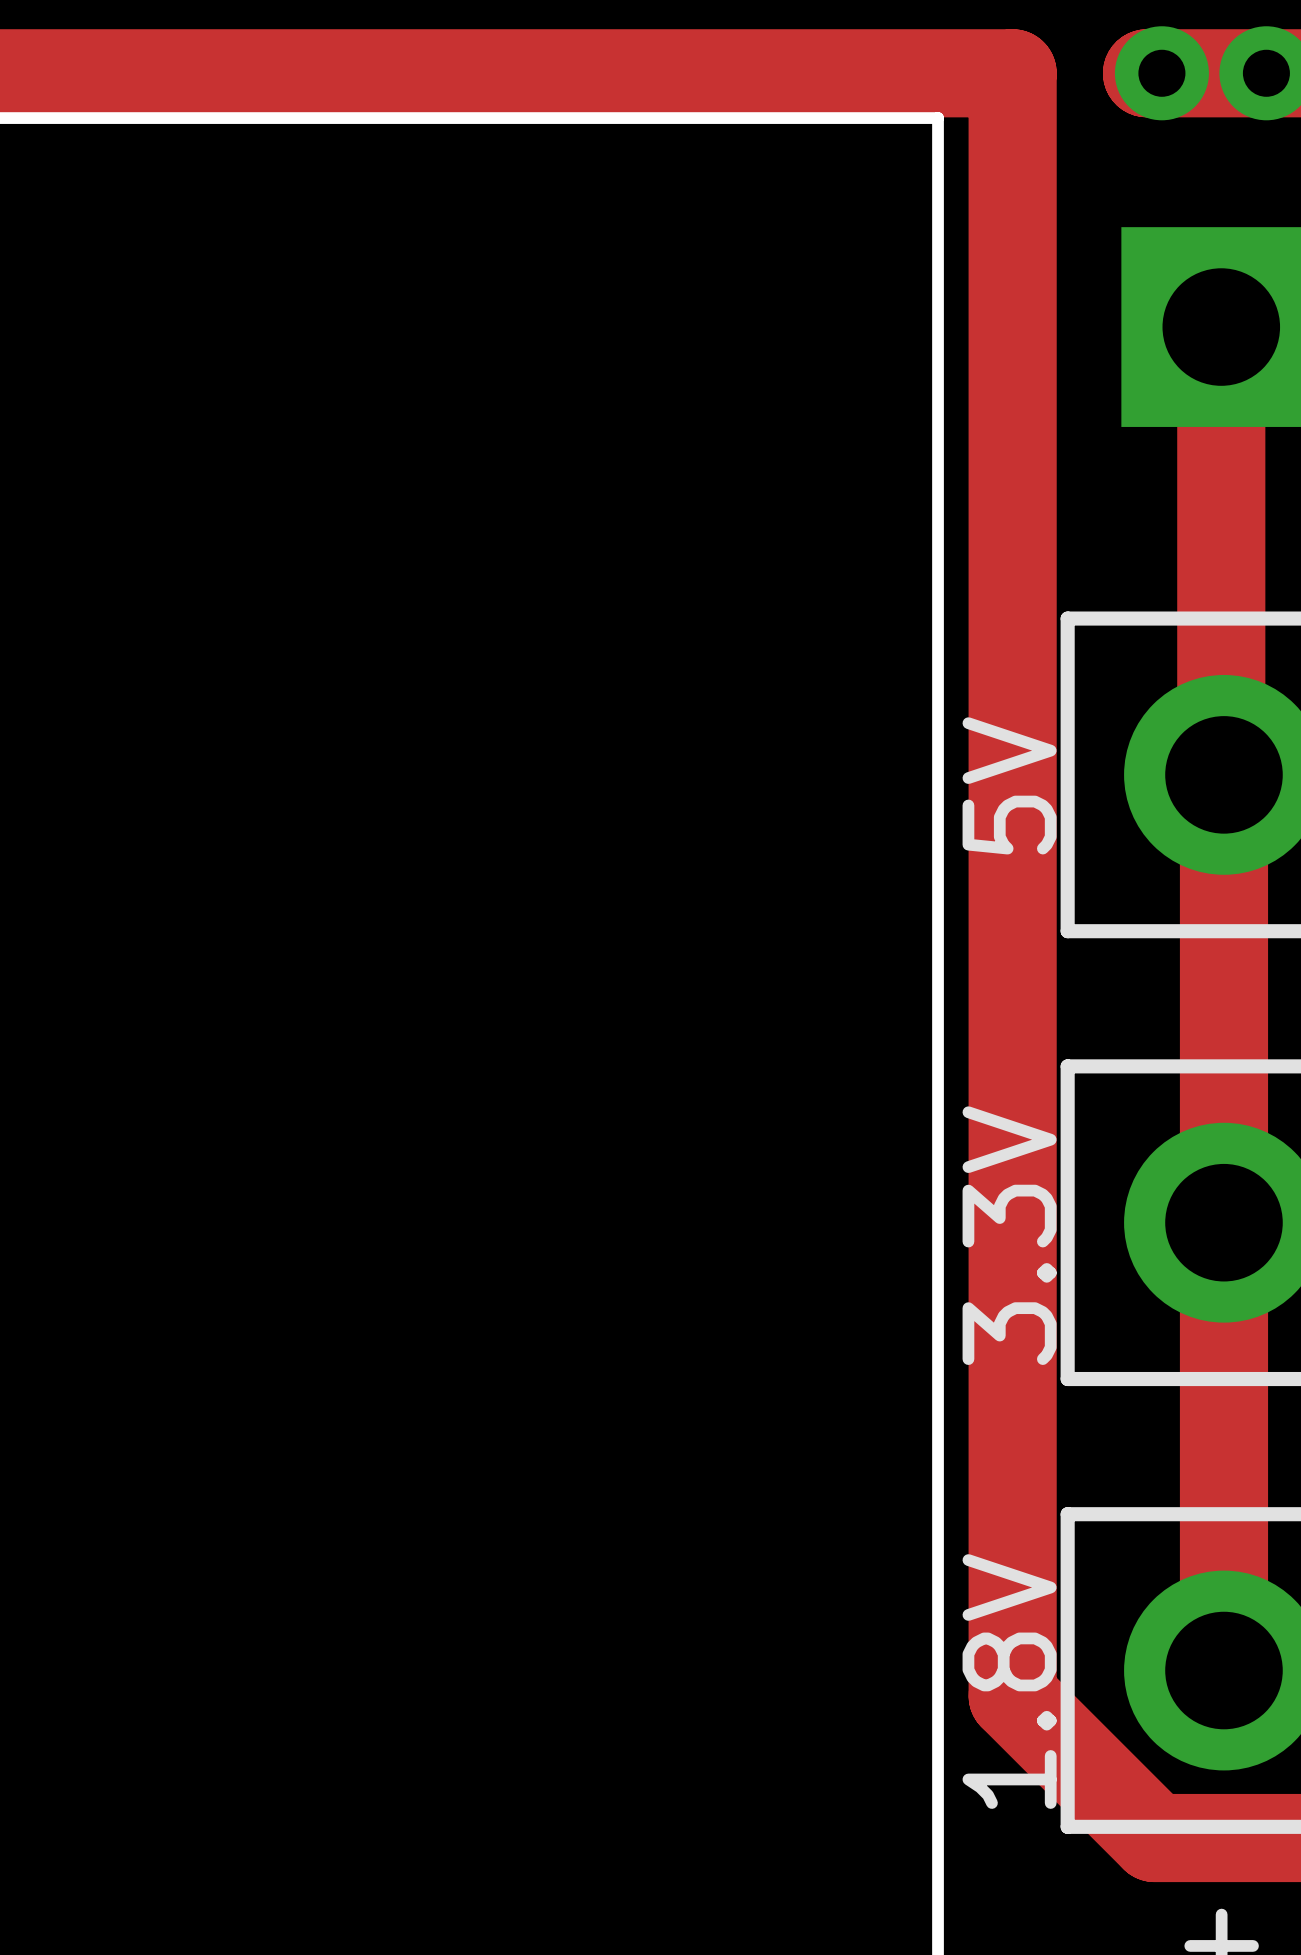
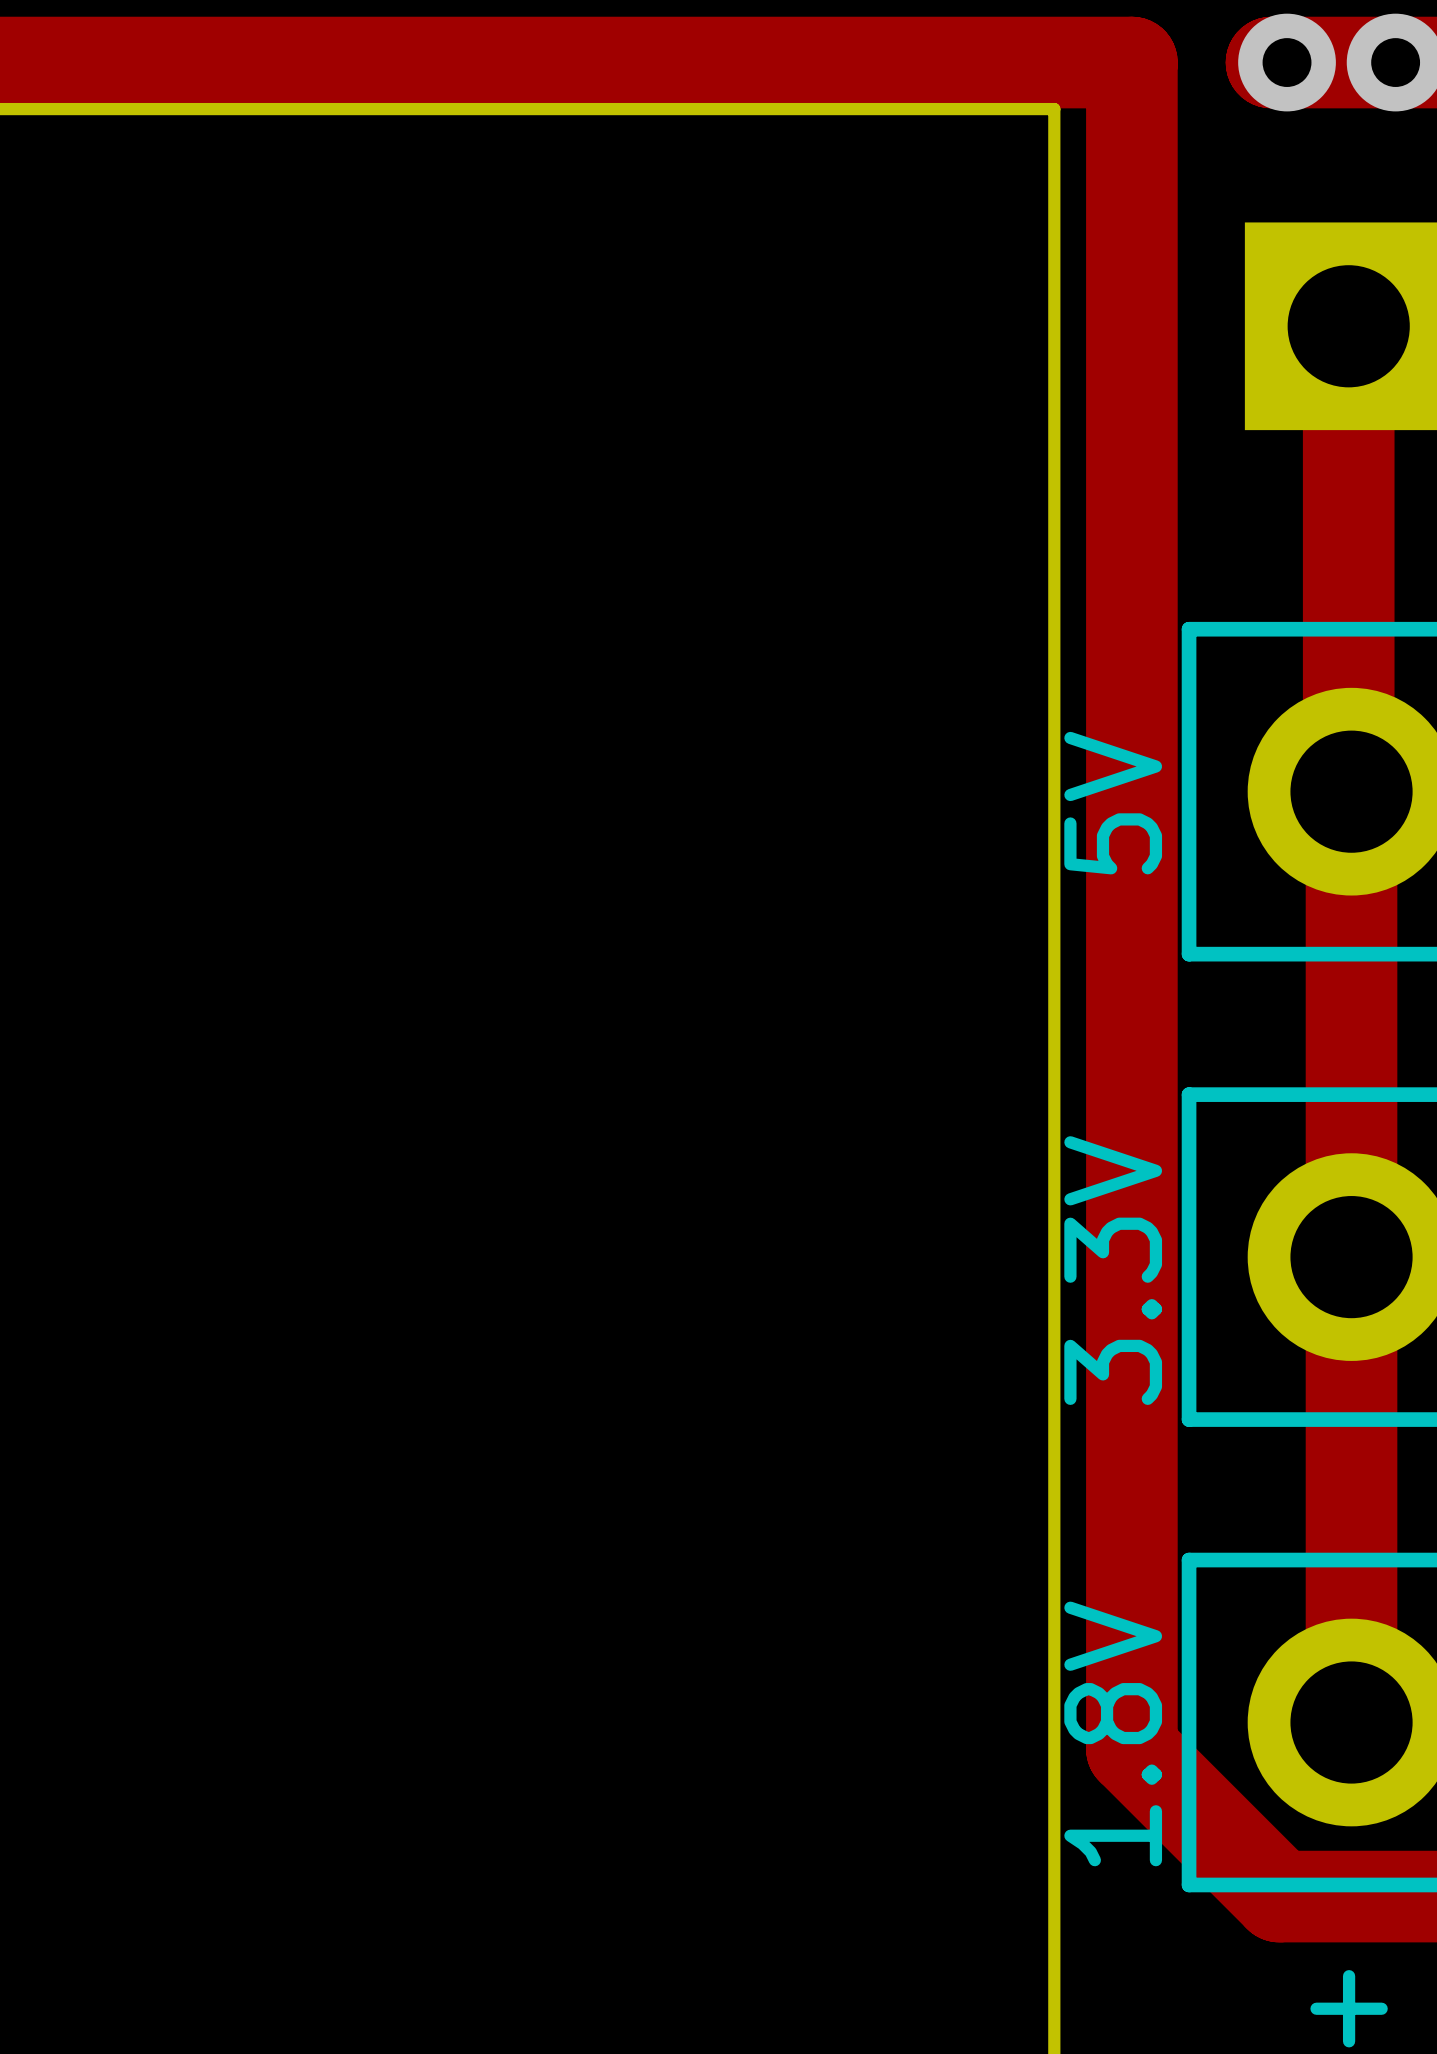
text position: 5V (1009, 785) -> 5V (1113, 803)
text position: 3.3V (1009, 1235) -> 3.3V (1113, 1270)
text position: 1.8V (1009, 1681) -> 1.8V (1113, 1733)

